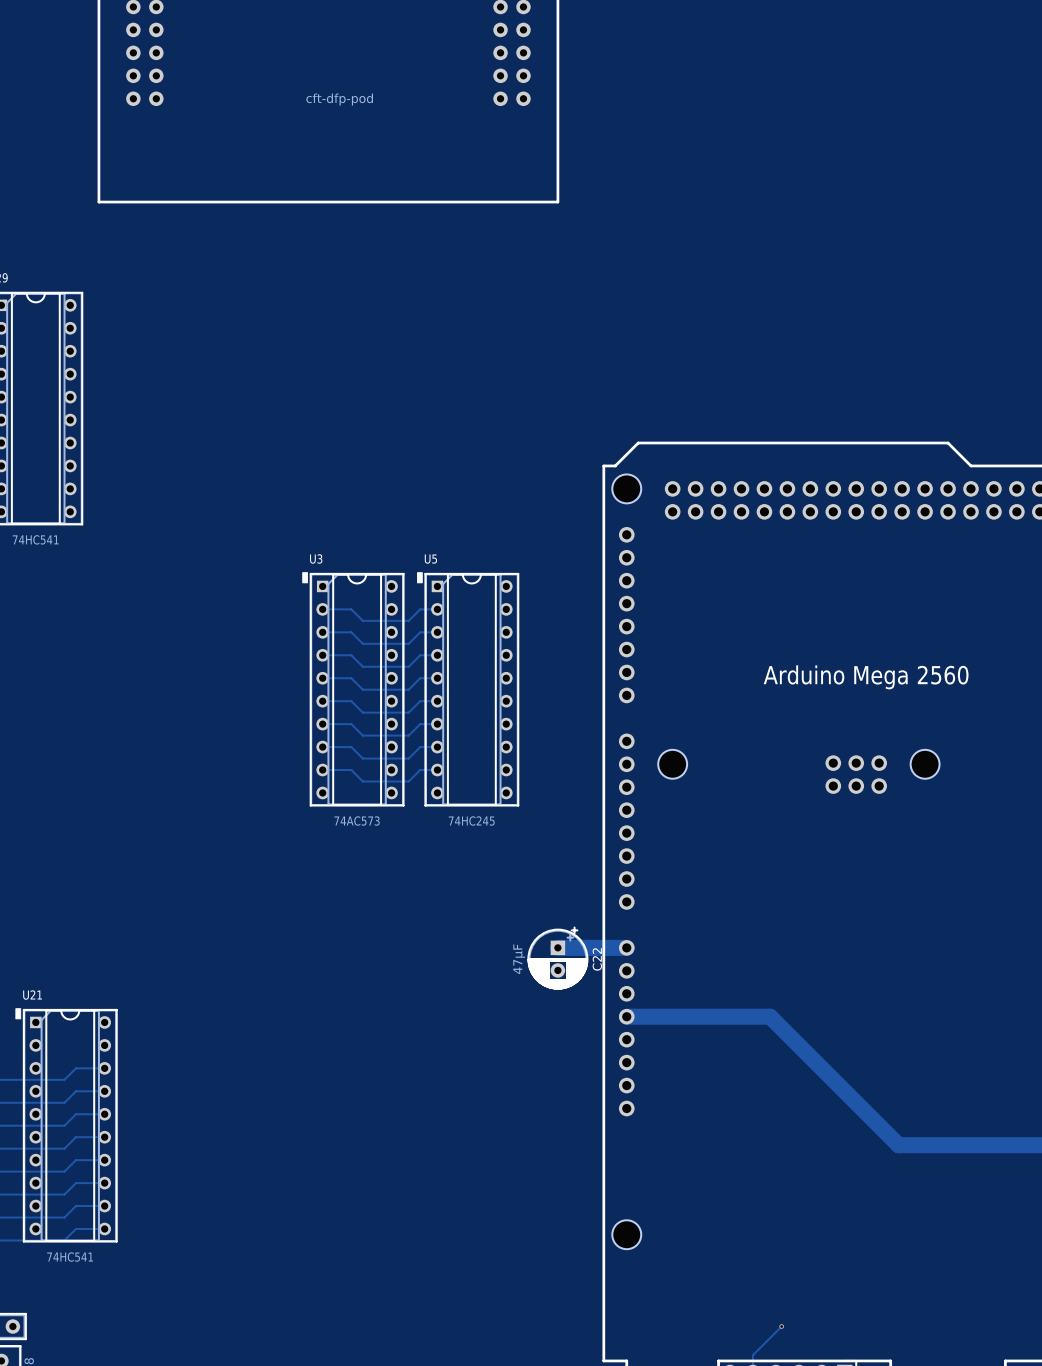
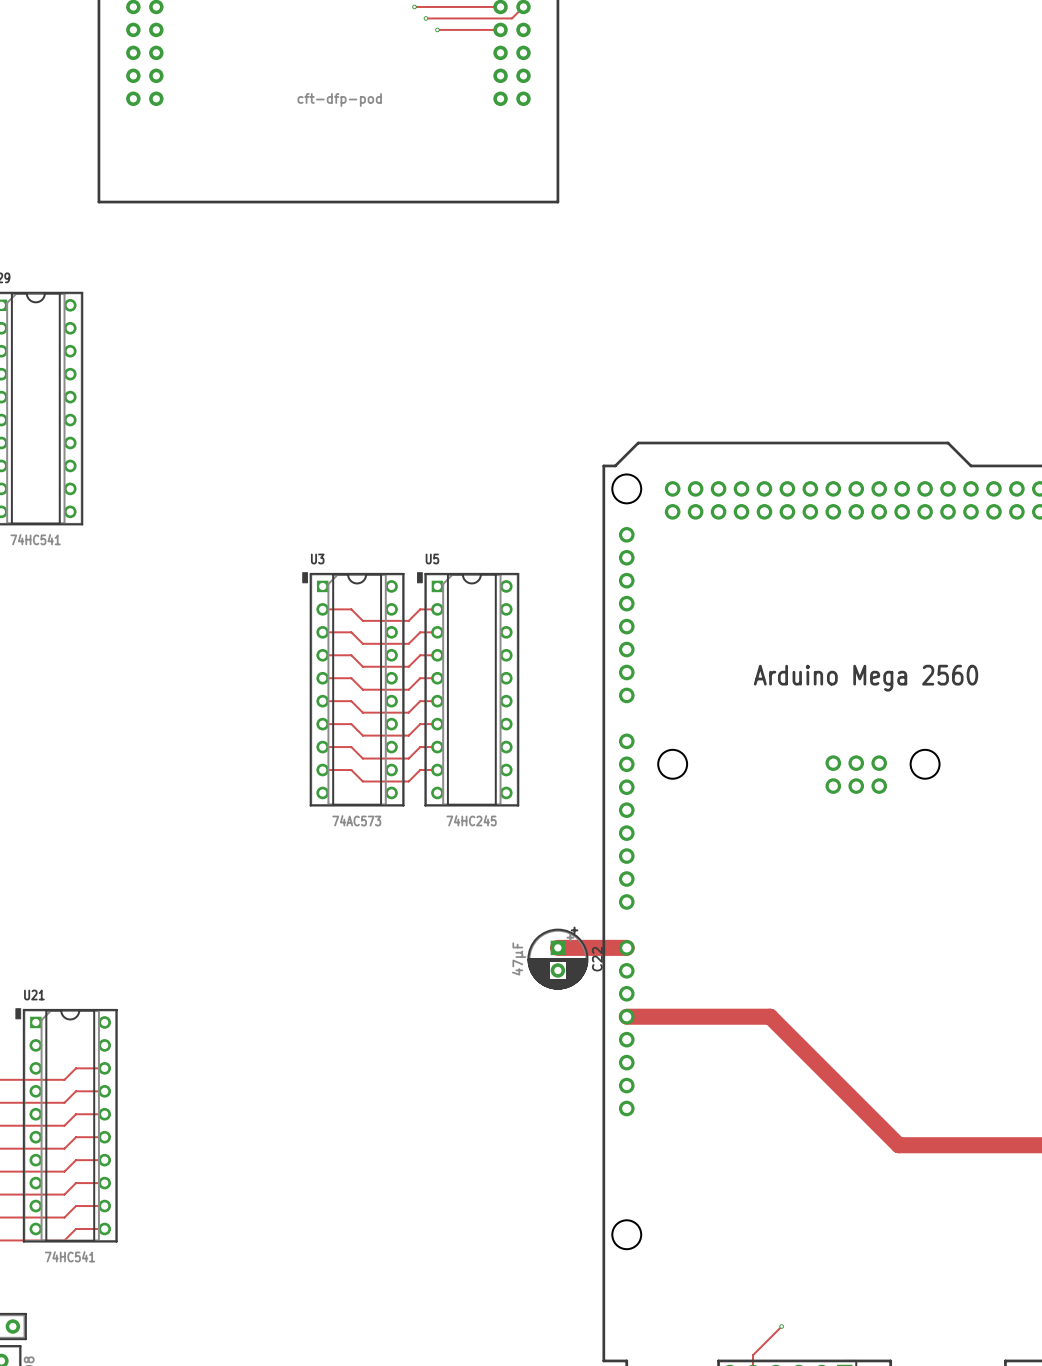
track: none -> (414, 6) (500, 6)
via: none -> (414, 6)
track: none -> (523, 6) (512, 18) (425, 18)
via: none -> (425, 18)
track: none -> (437, 29) (500, 29)
via: none -> (437, 29)

